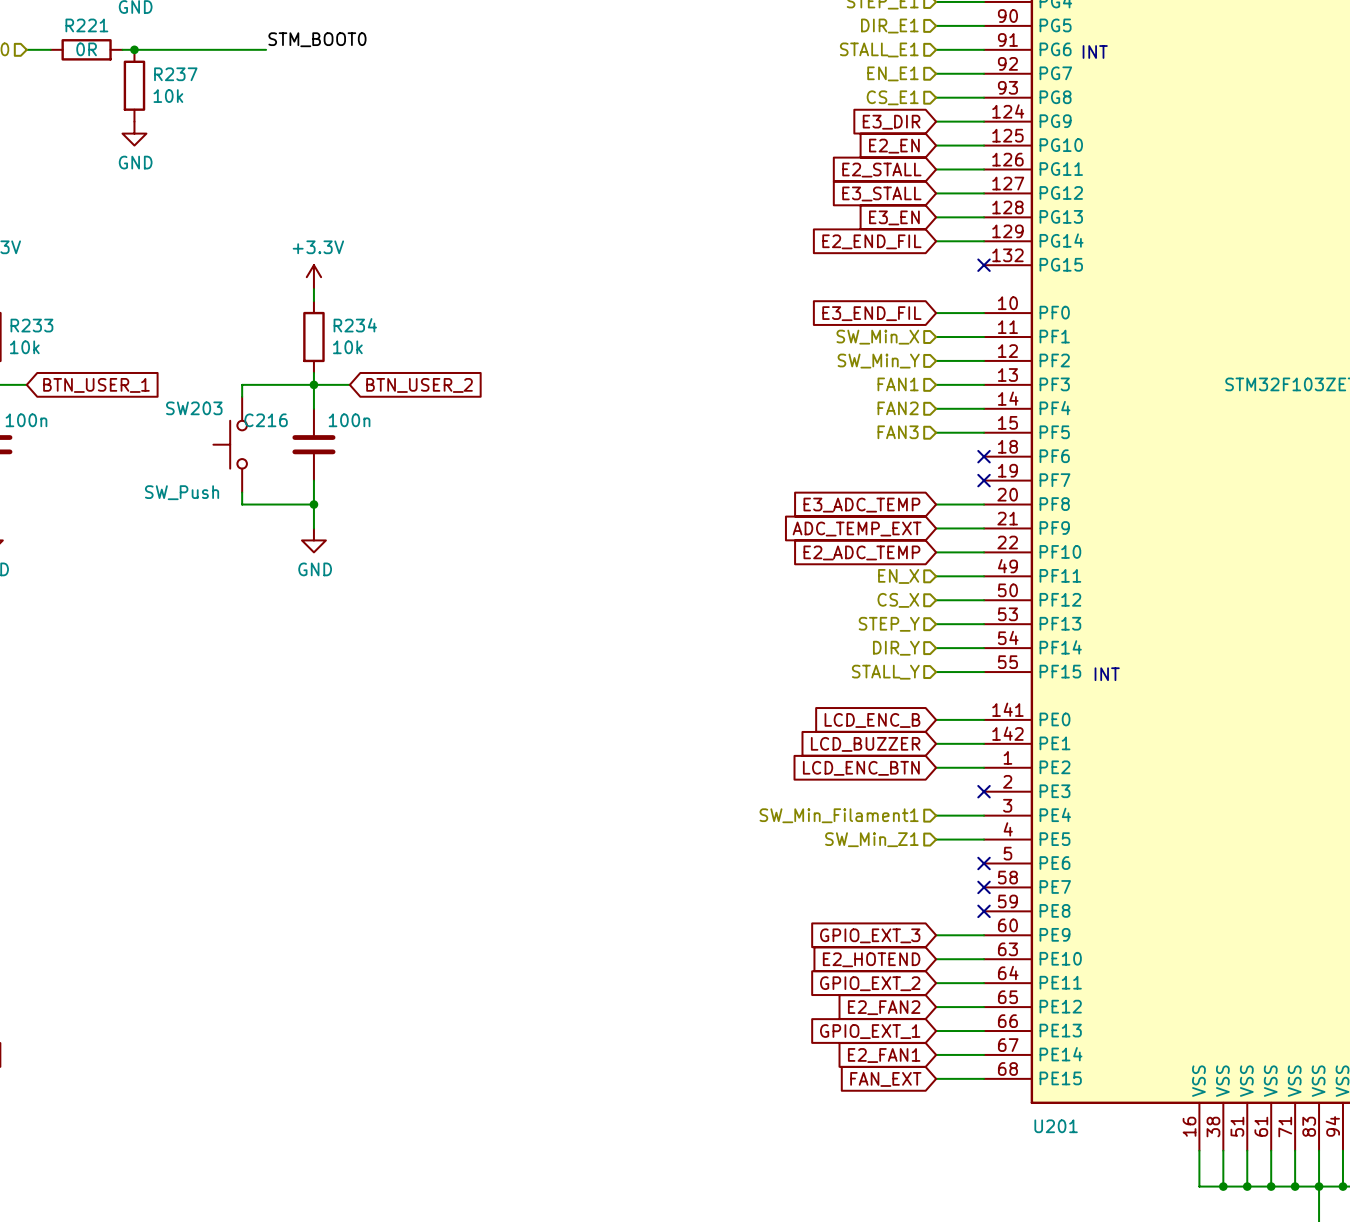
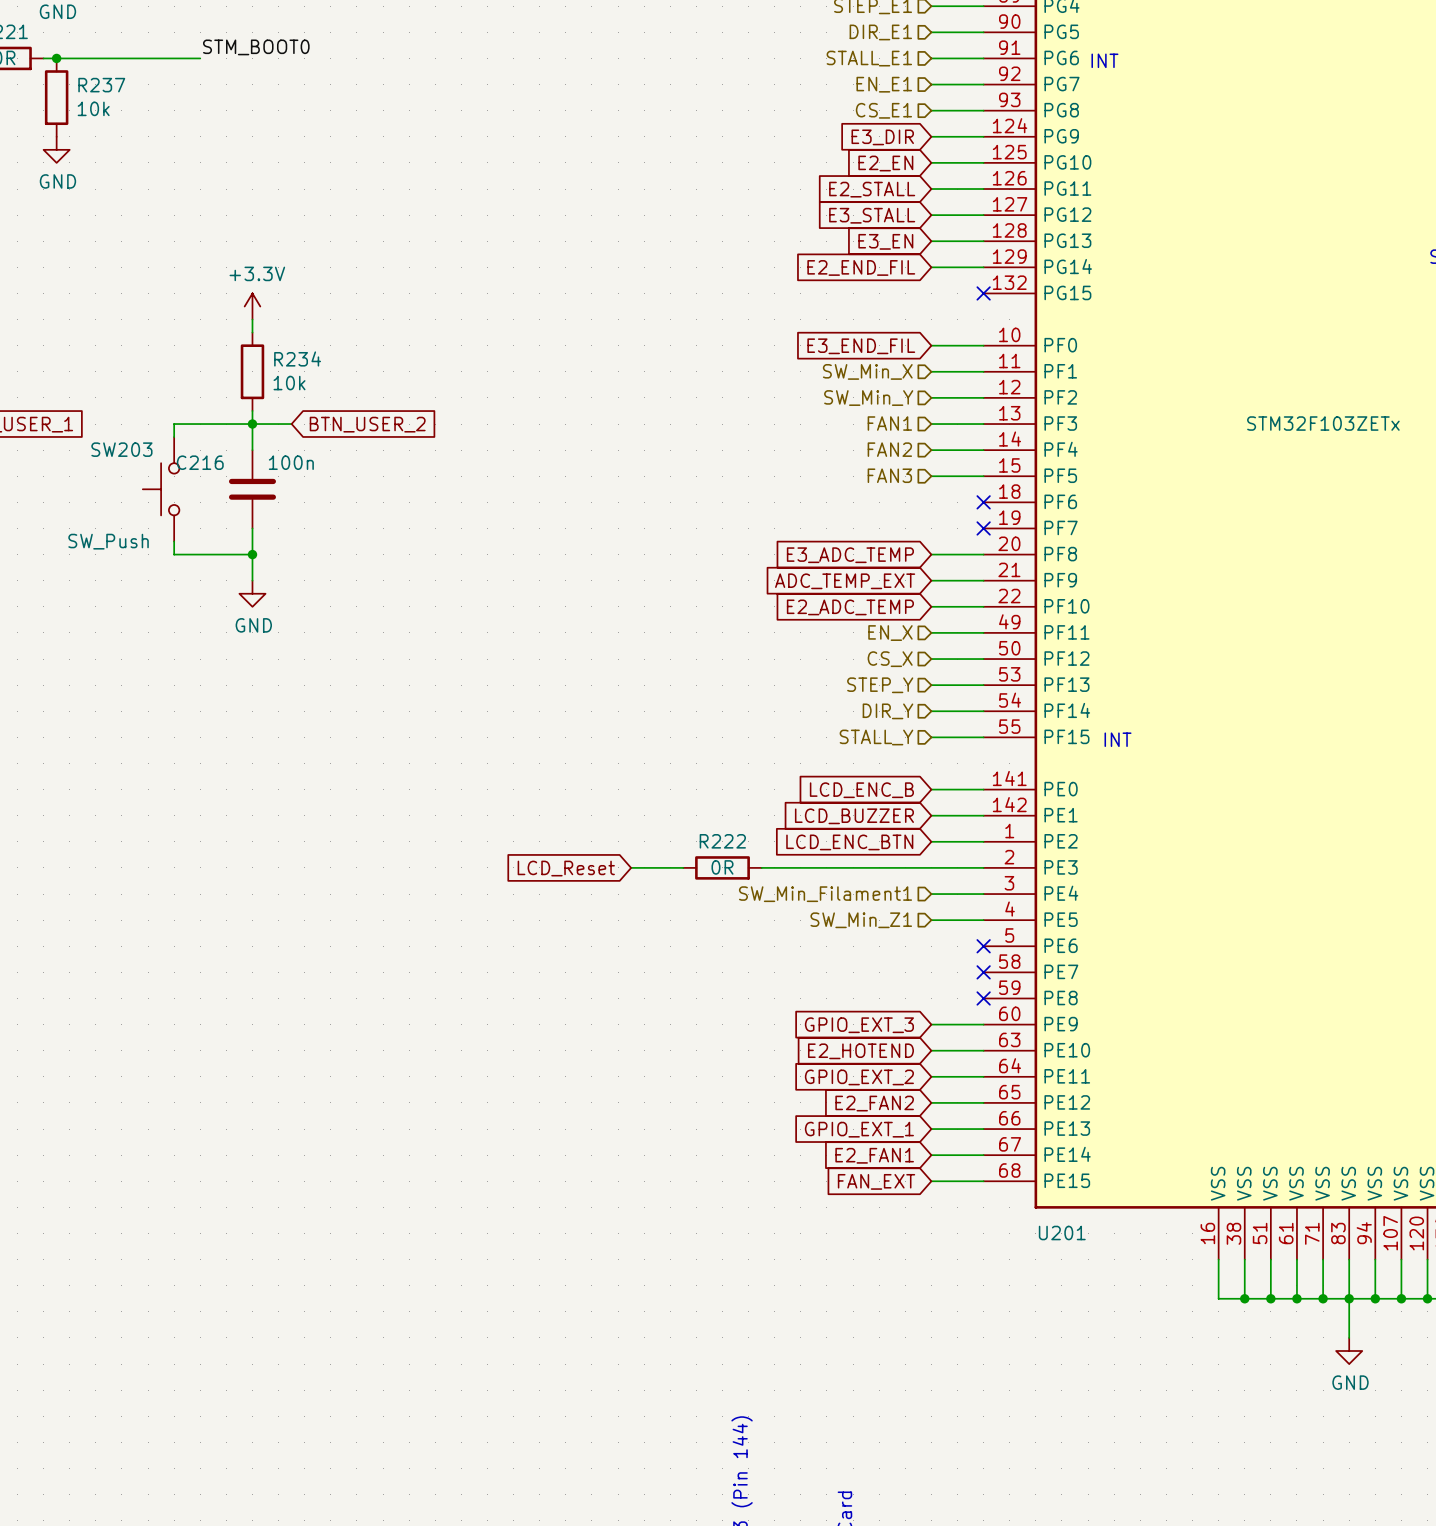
wire: none -> (631, 867) (683, 867)
R222: none -> 0R (722, 867)
wire: none -> (761, 867) (983, 867)
no-connect mark: (984, 791) -> none
global label: none -> LCD_Reset (566, 868)

